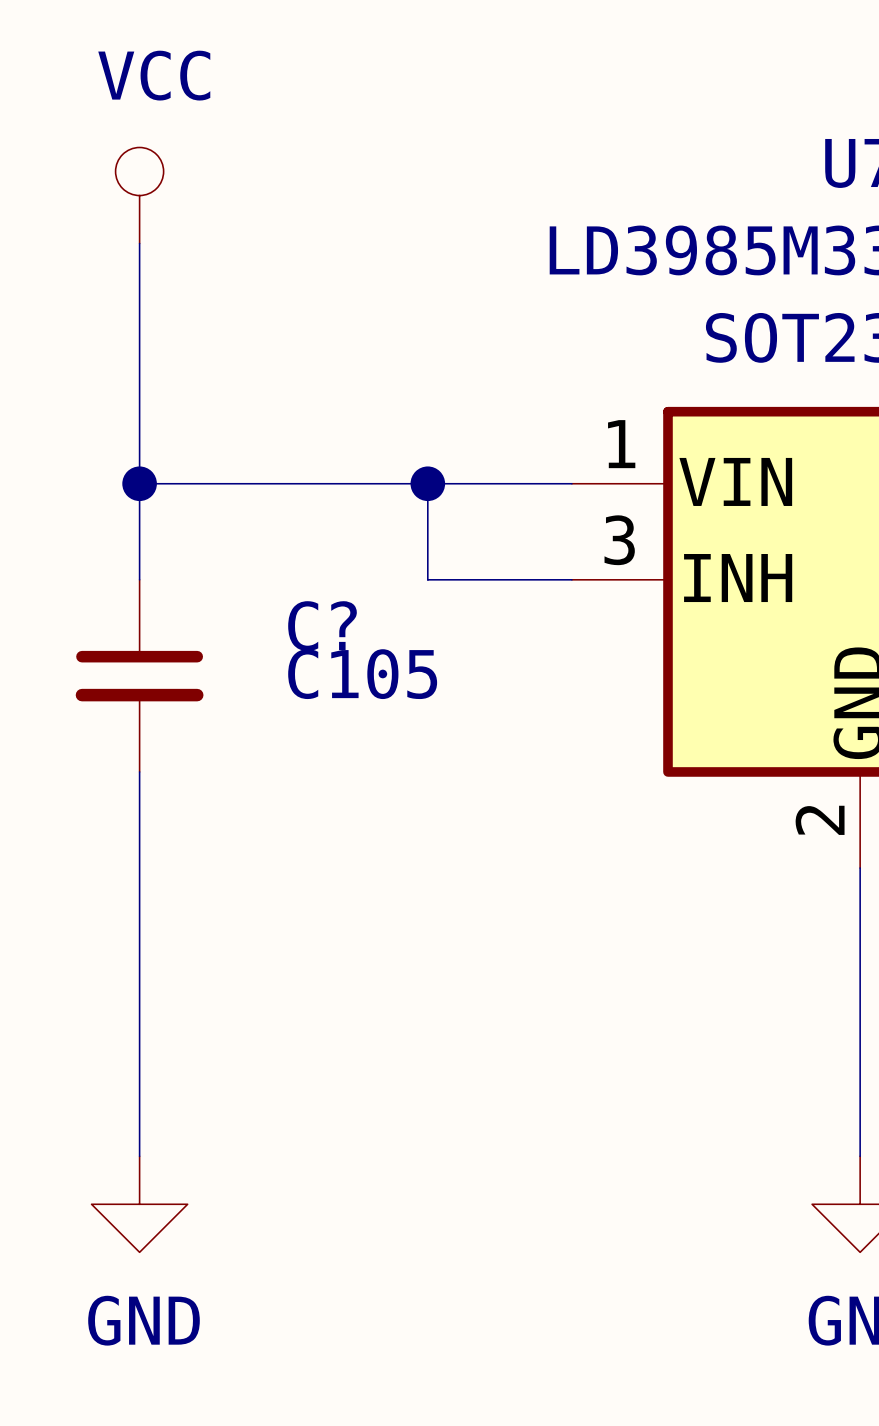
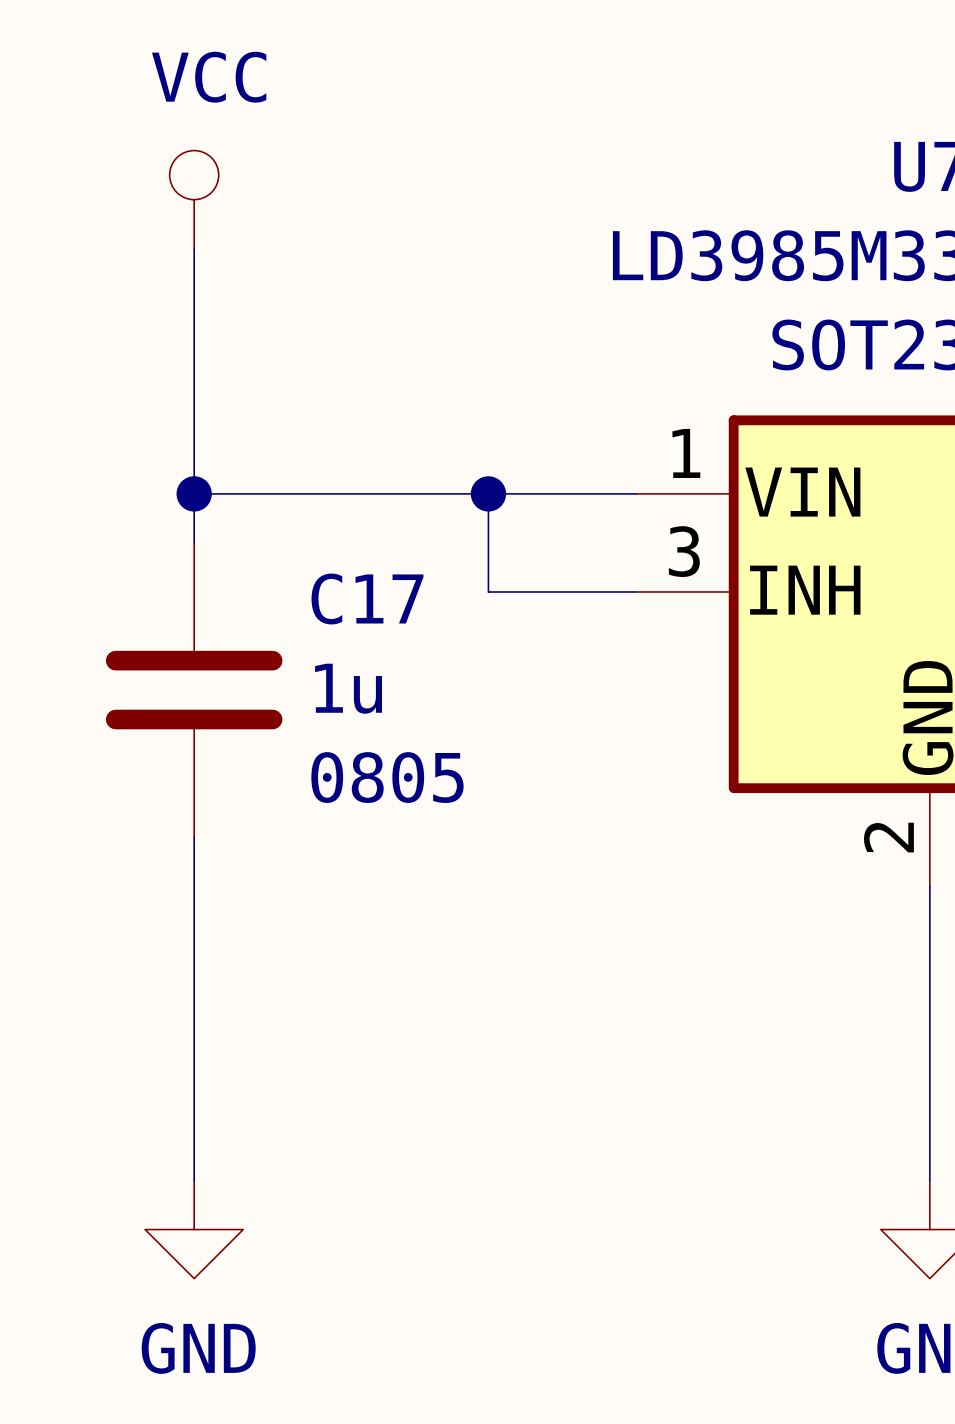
C?: C105 (139, 675) -> none
C17: none -> 1u (194, 690)

